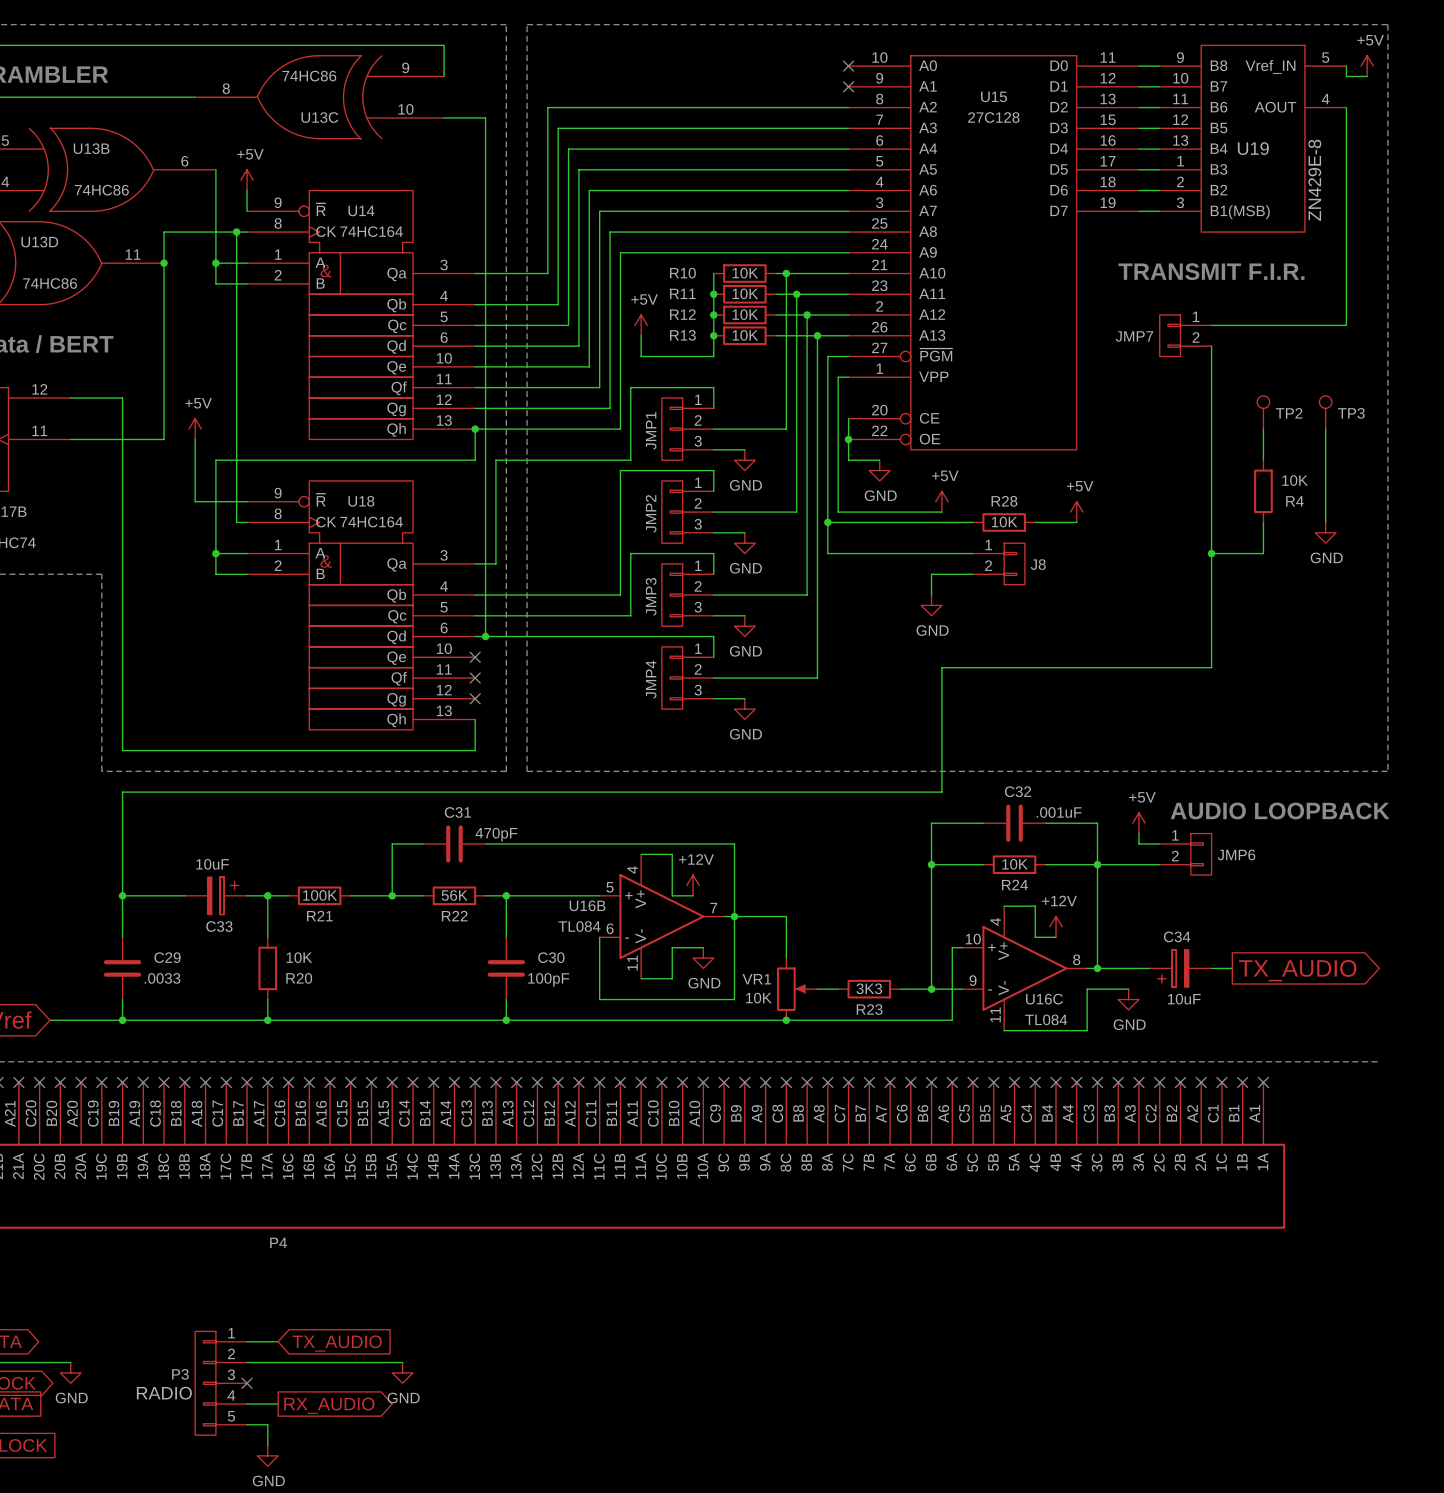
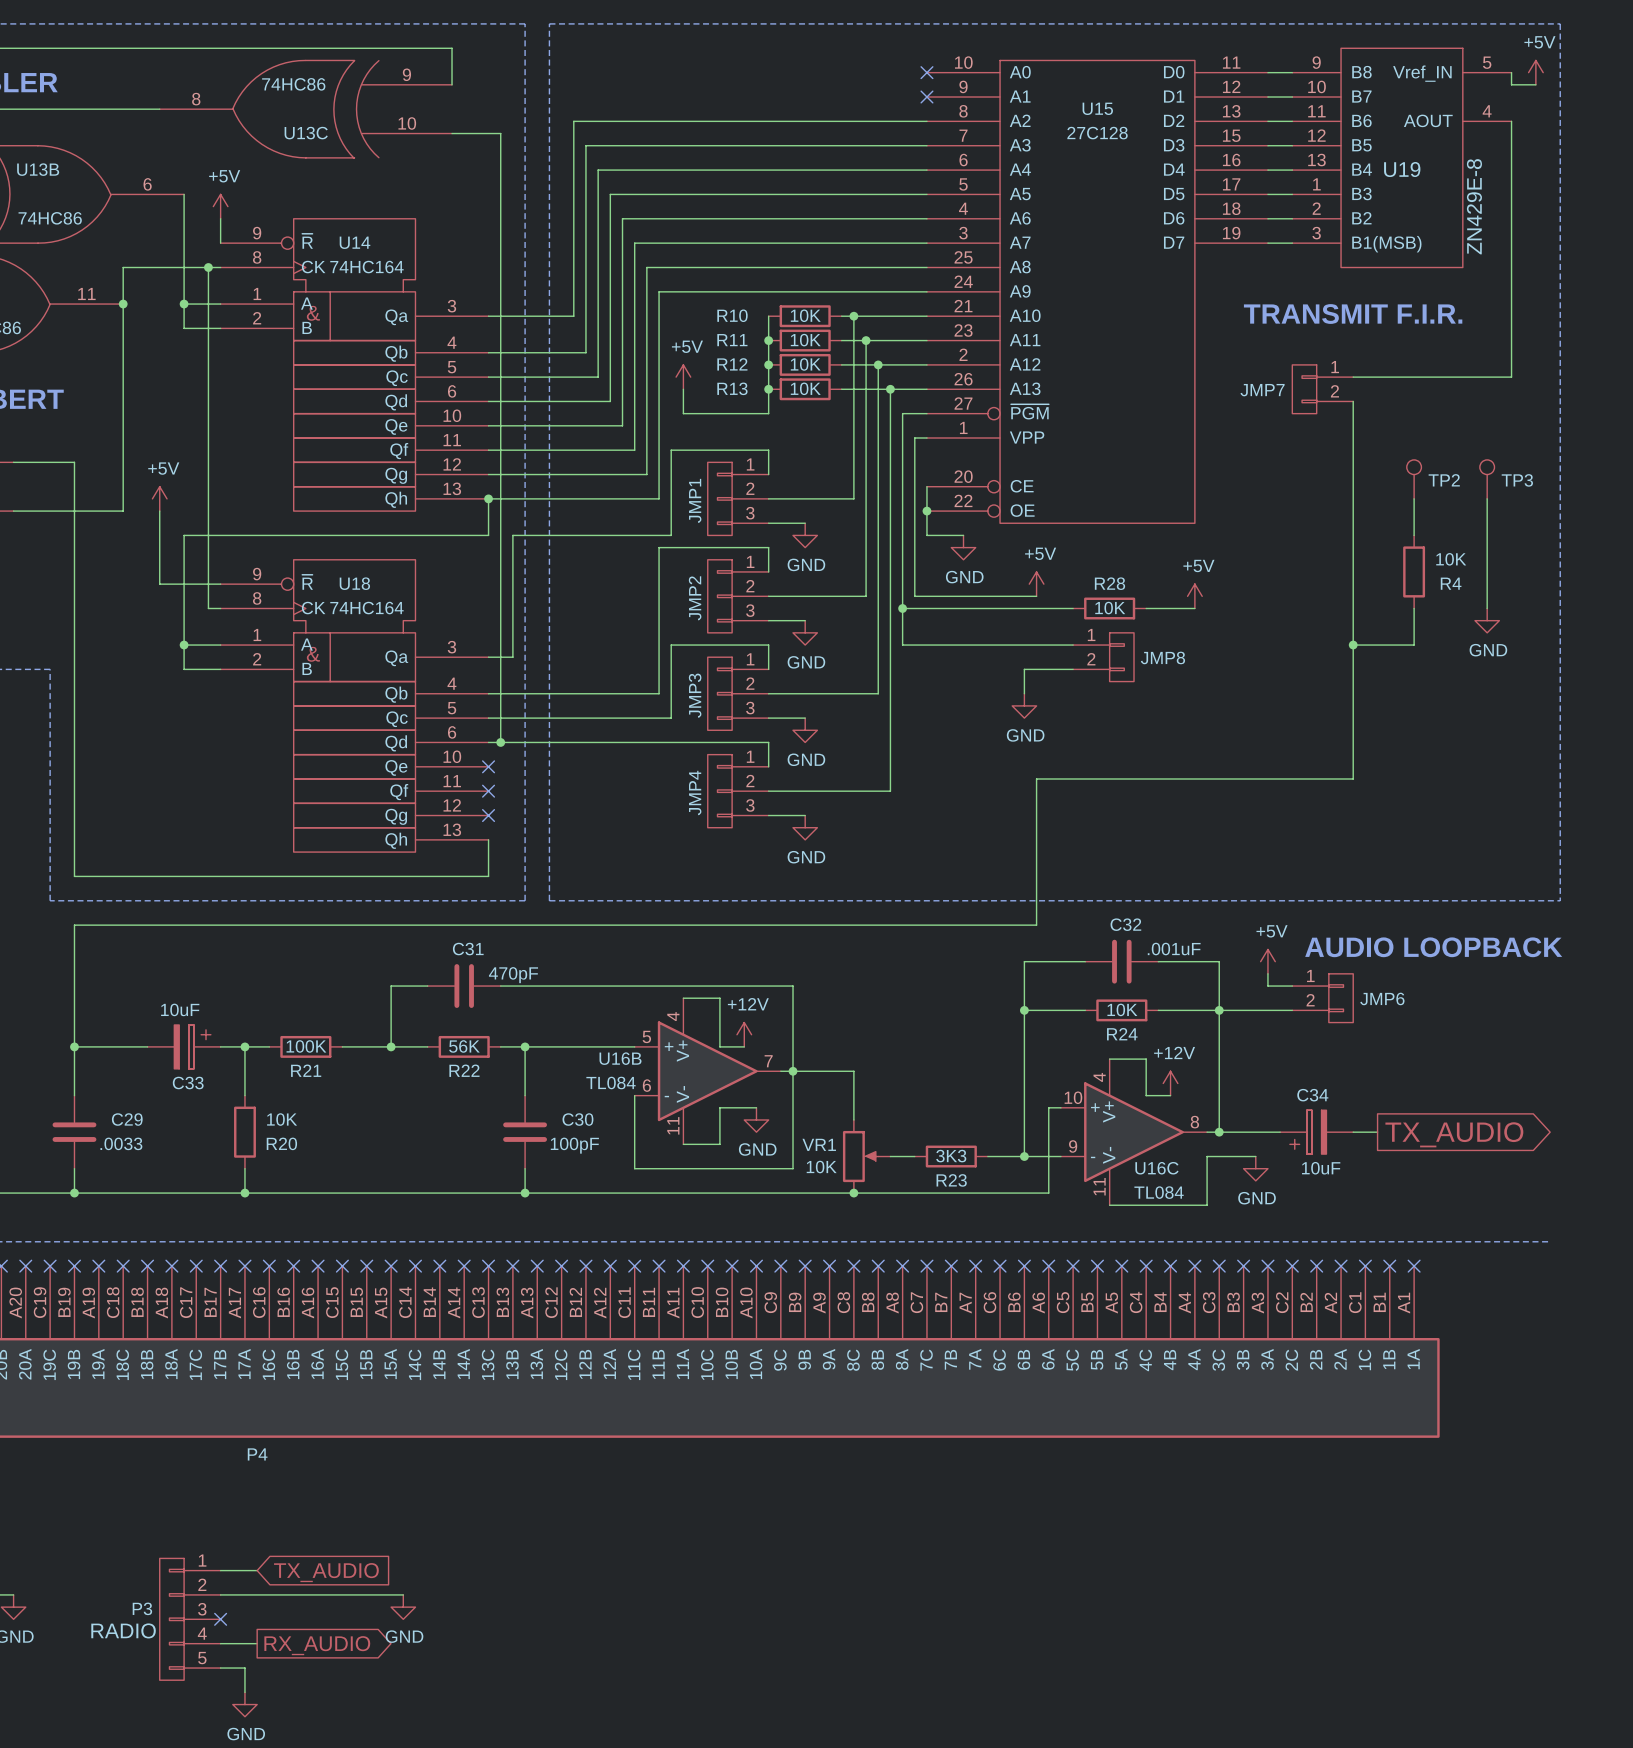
J8 name: J8 (1038, 564) -> JMP8 (1162, 657)

